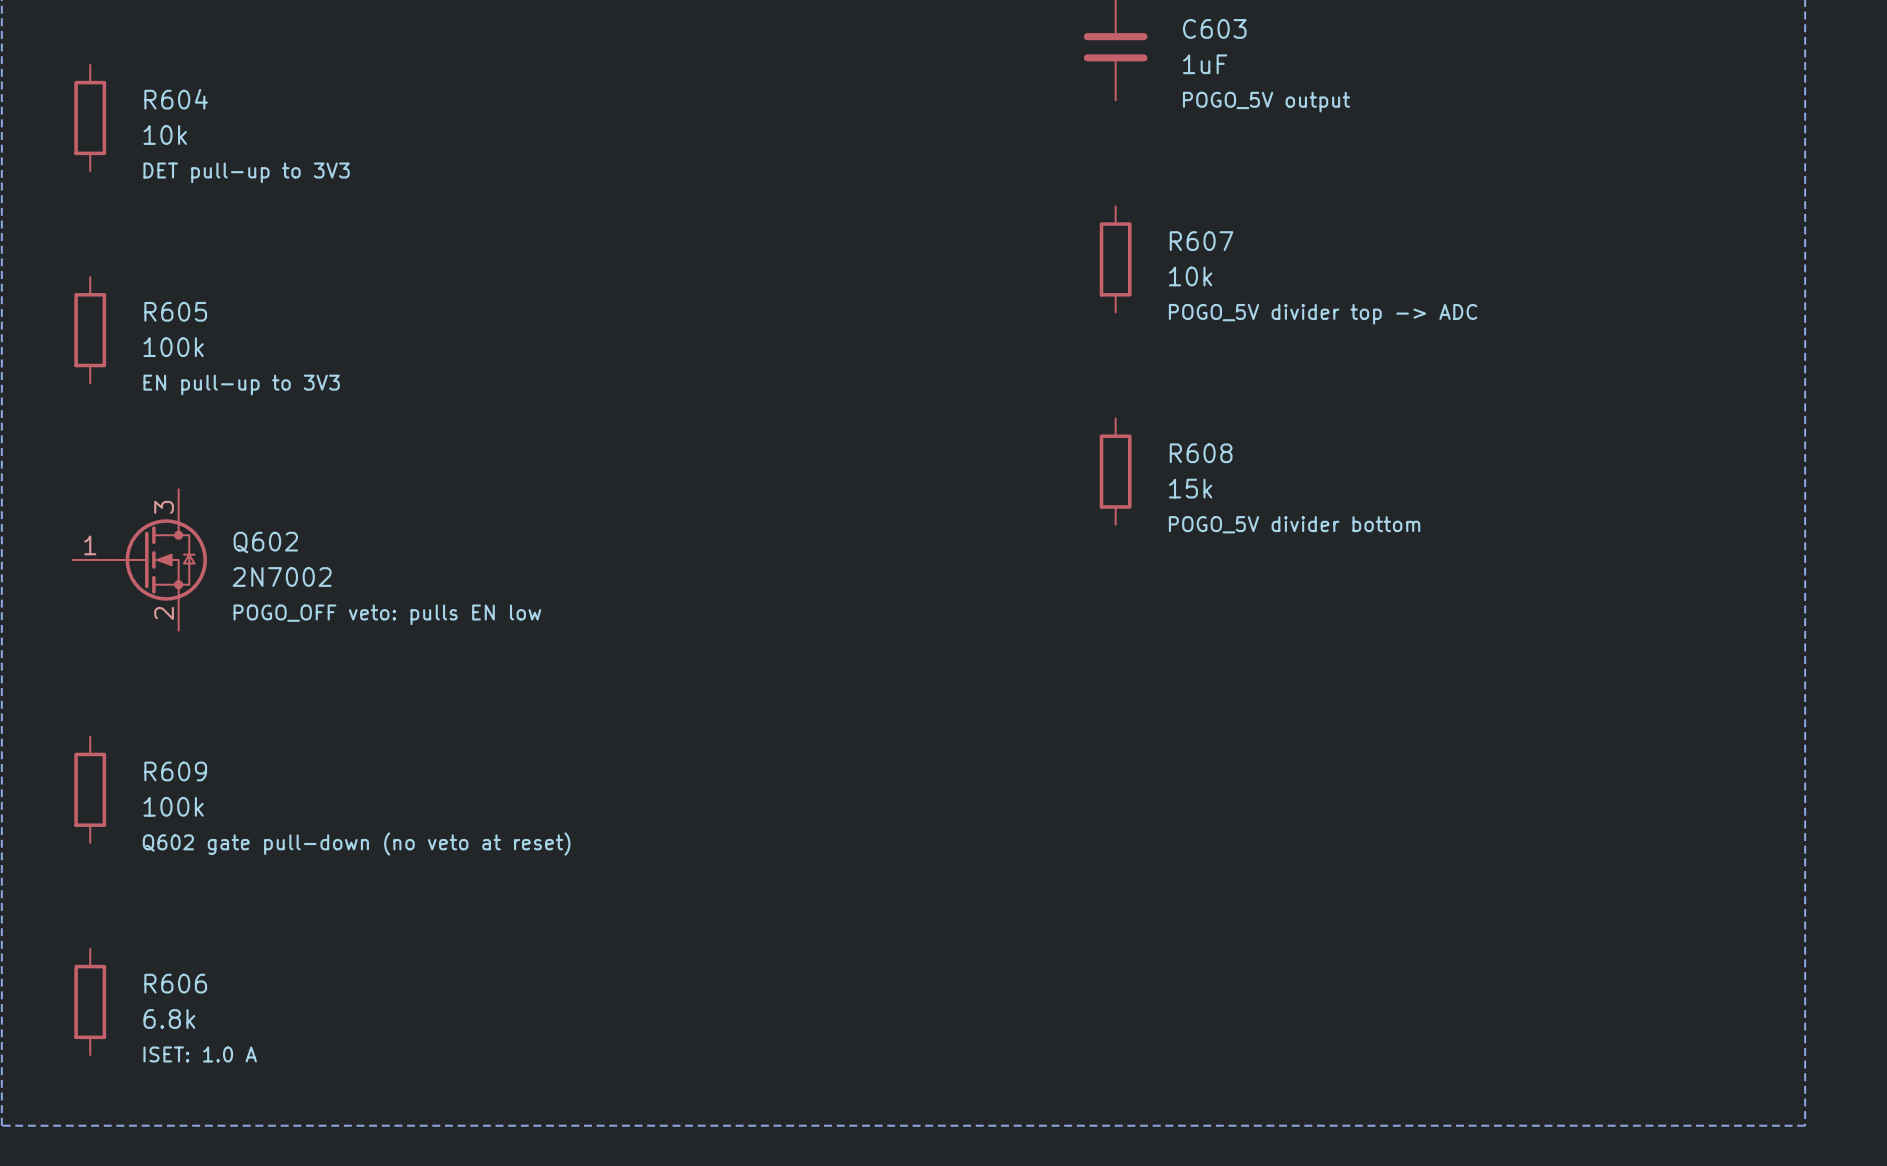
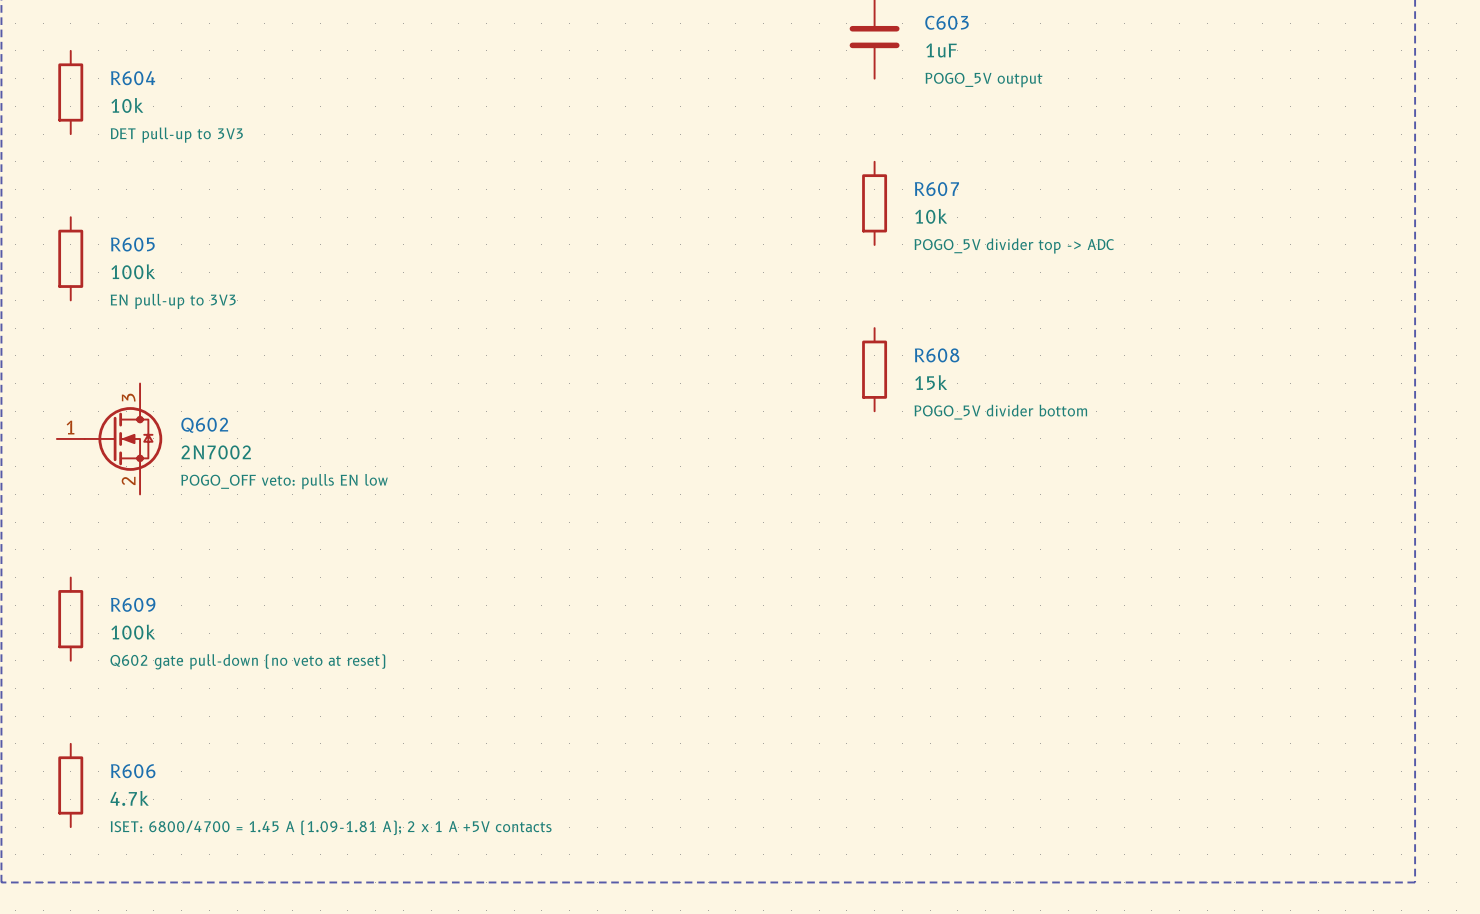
R606 value: 6.8k (169, 1018) -> 4.7k (129, 798)
R606 text: ISET: 1.0 A (200, 1054) -> ISET: 6800/4700 = 1.45 A (1.09-1.81 A); 2 x 1 A +5V contacts (331, 827)

